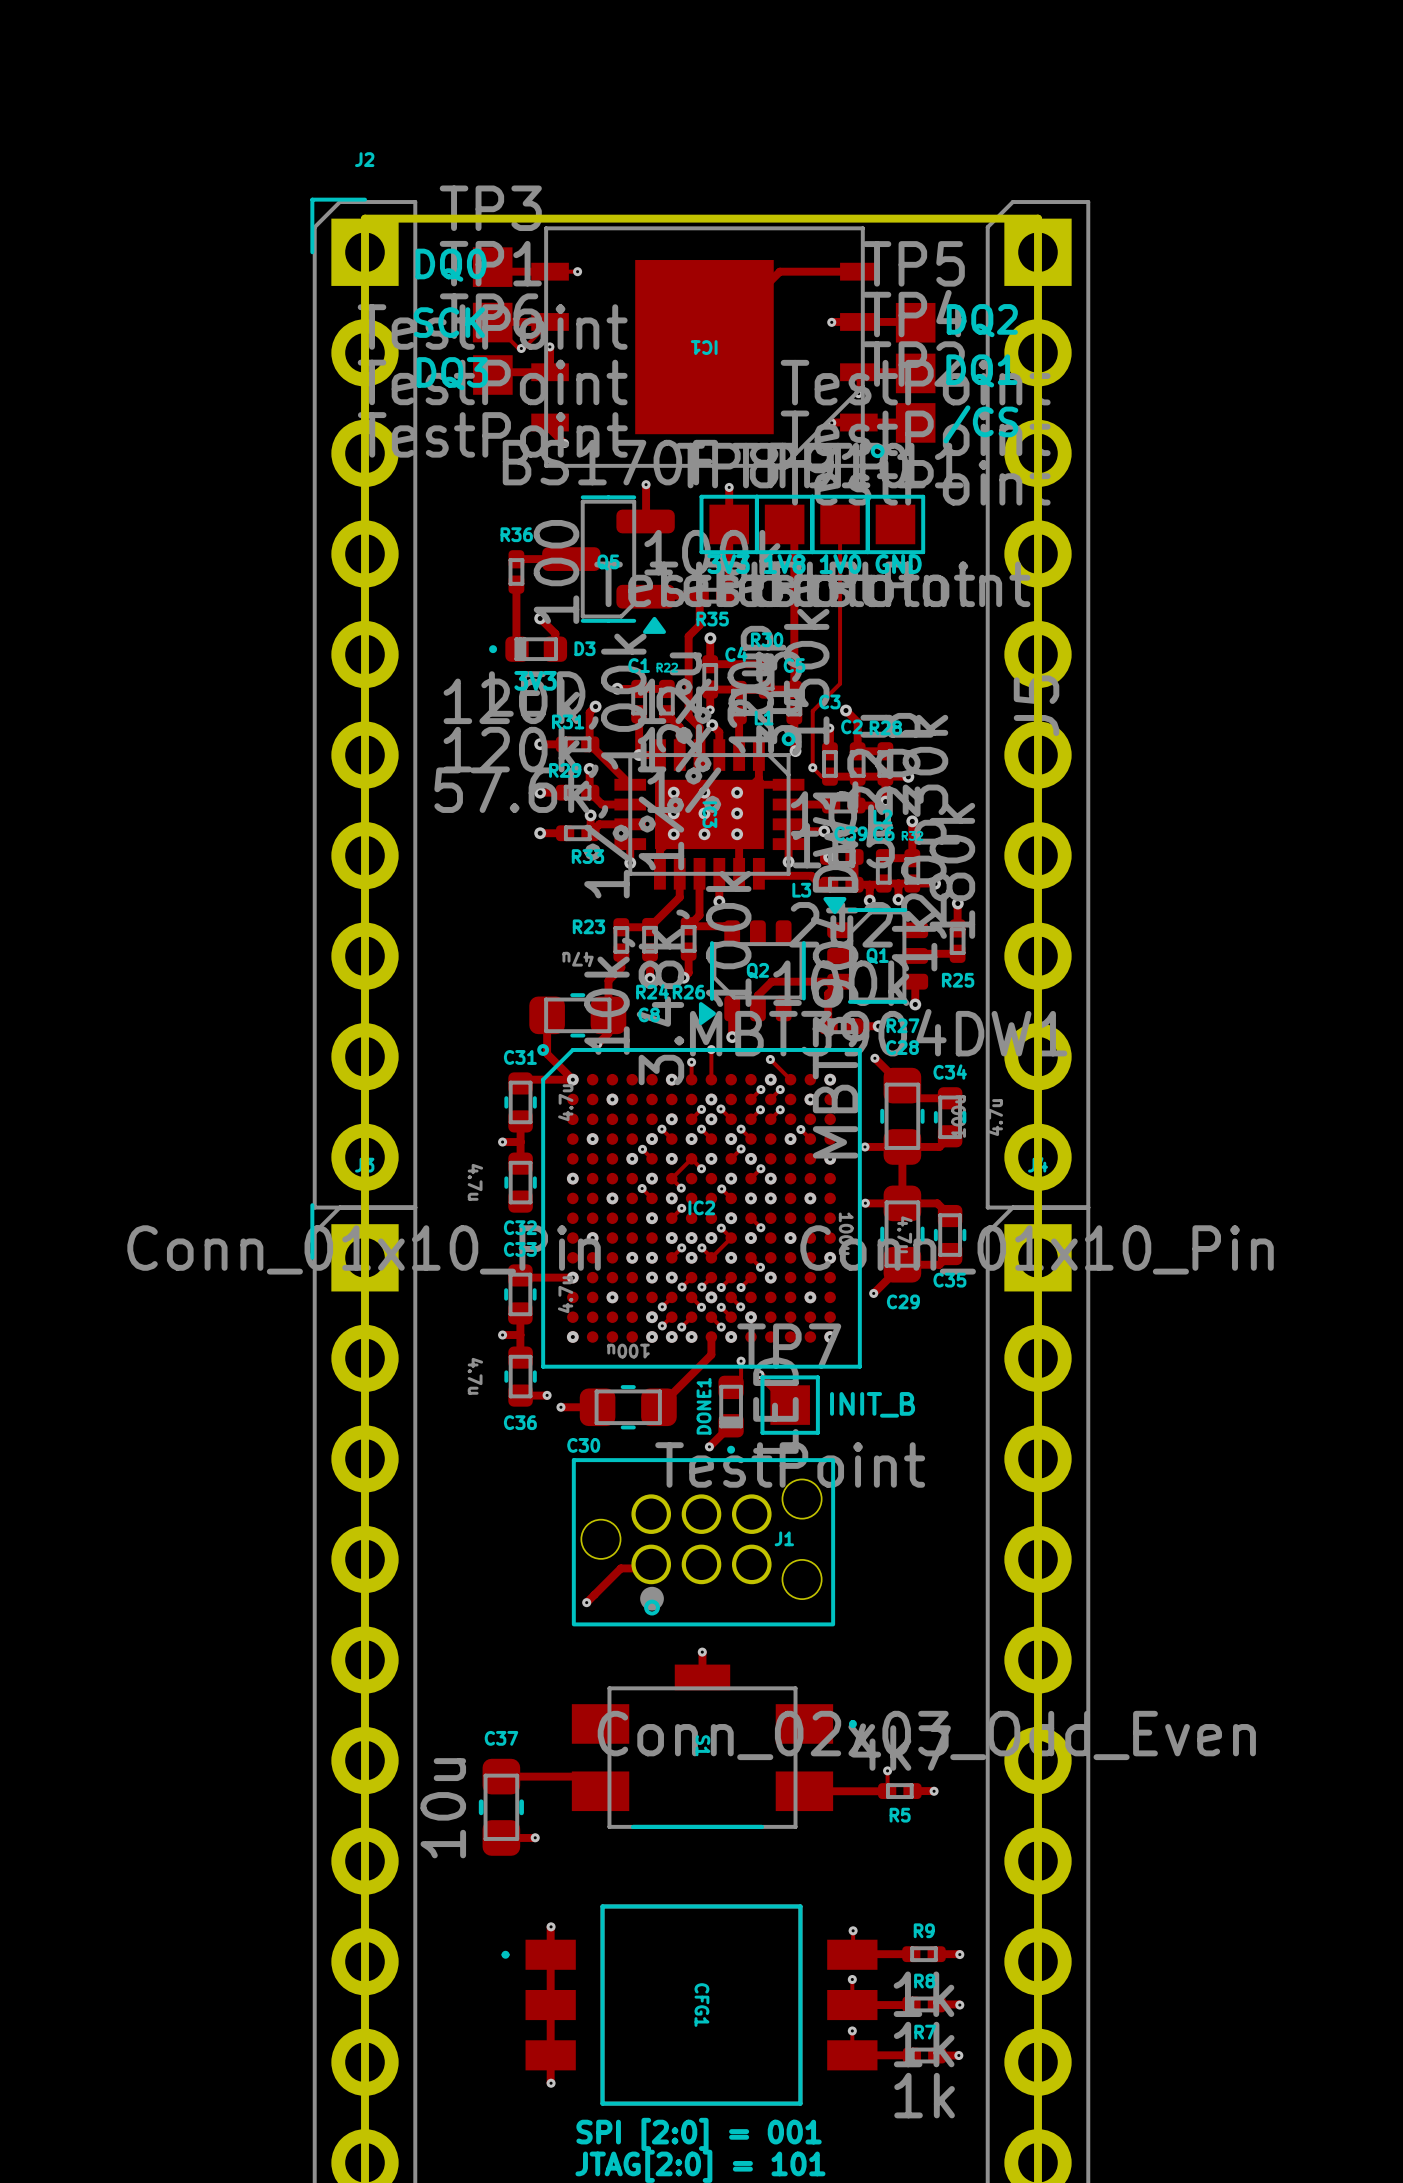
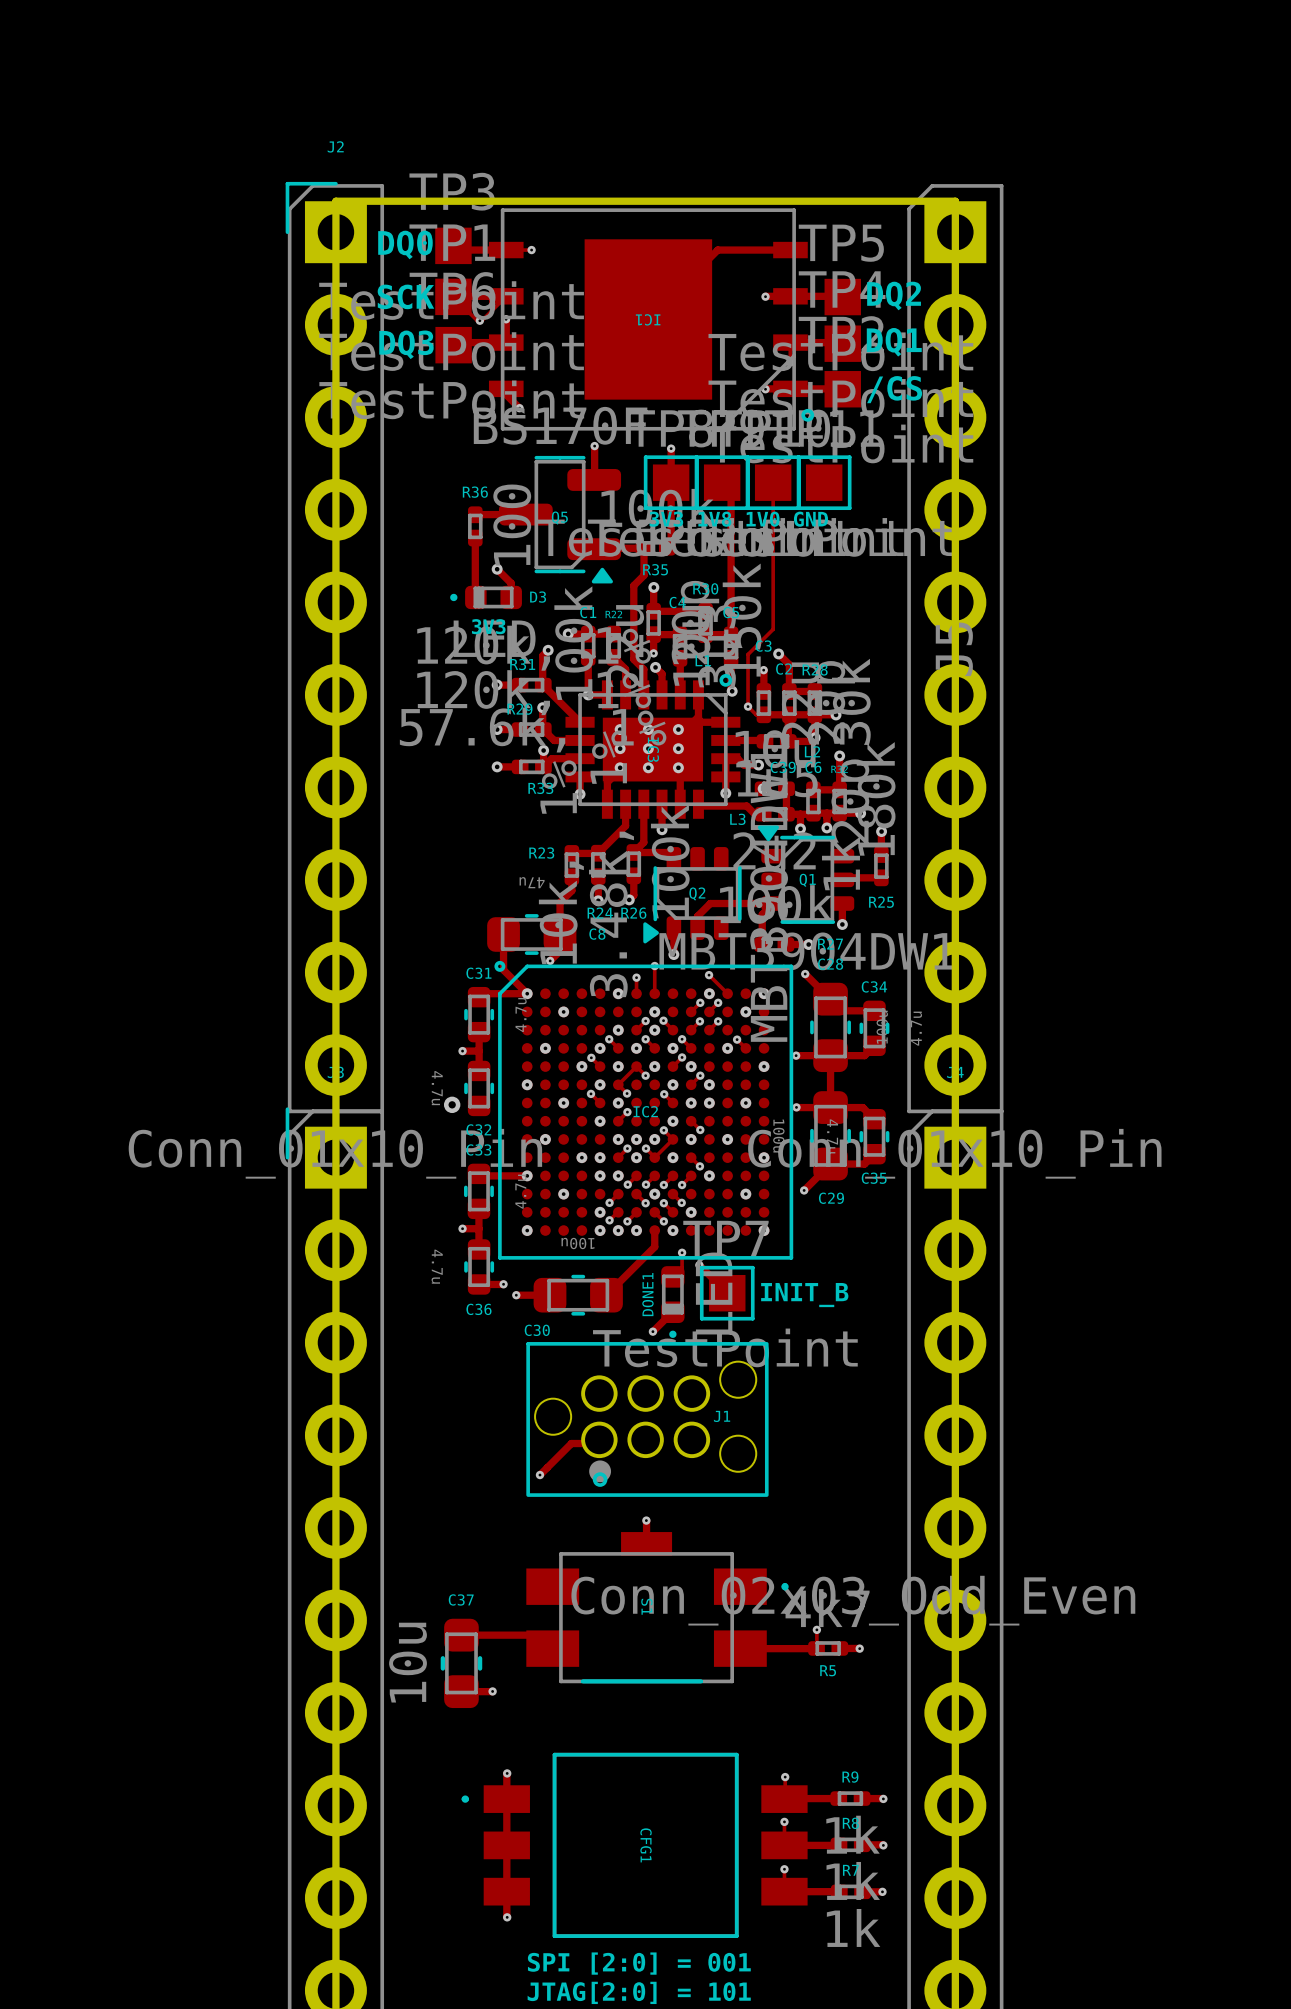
via: none -> (452, 1104)

